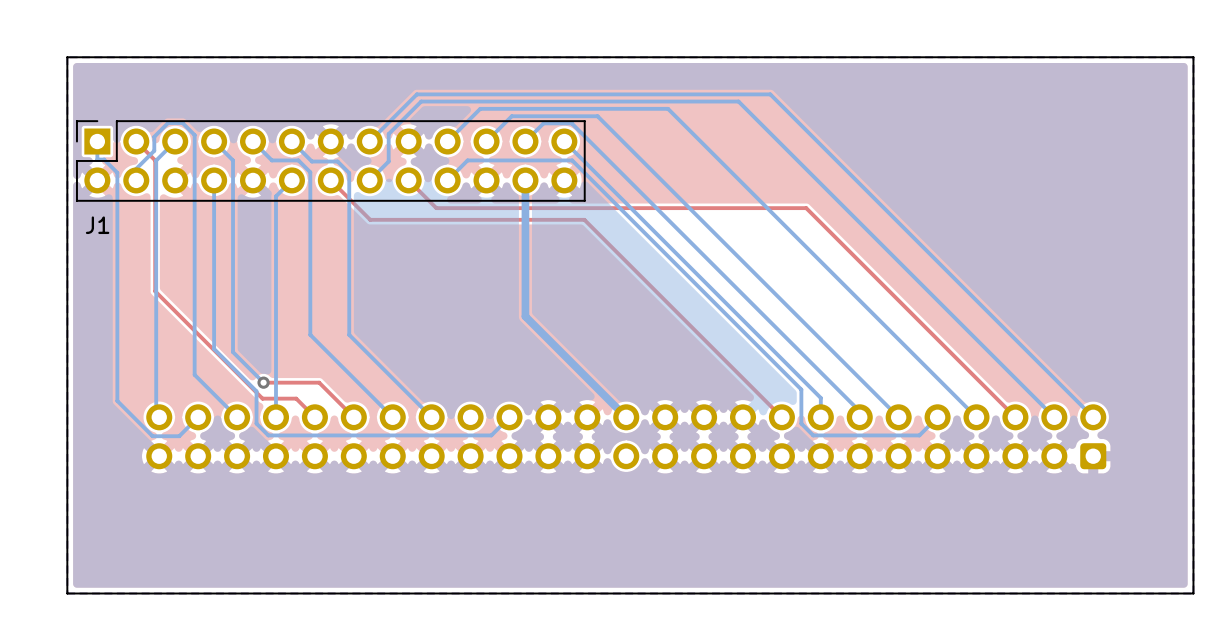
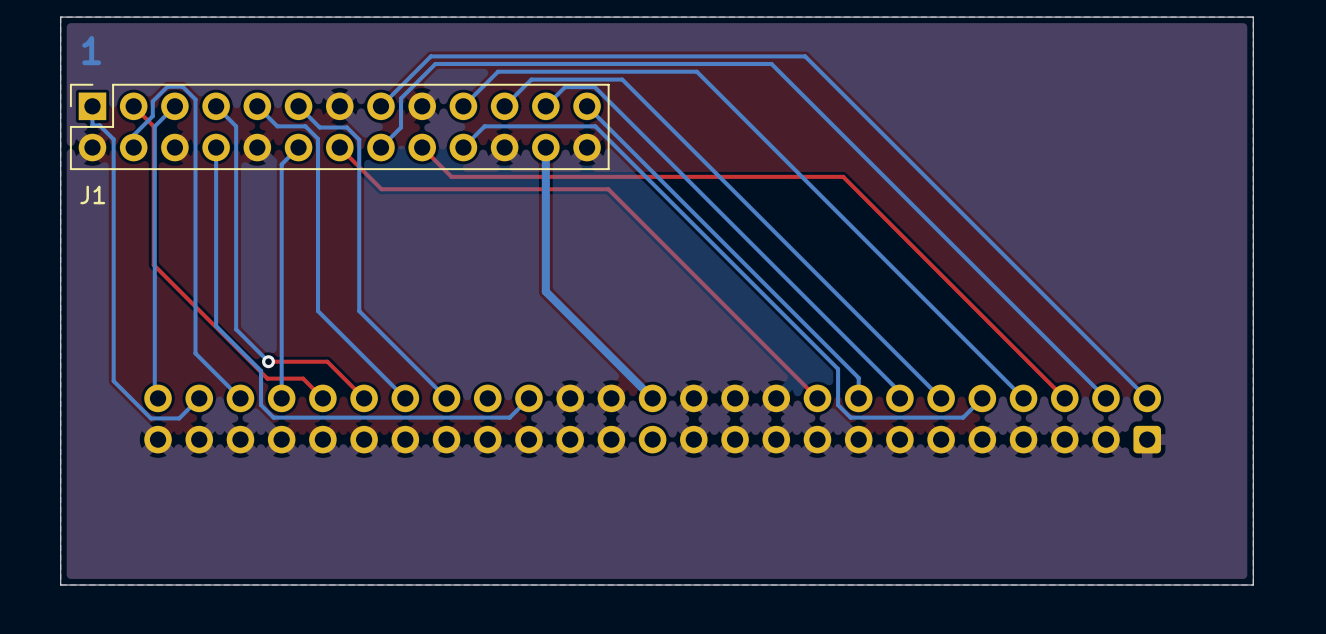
text: none -> 1 (91, 50)

